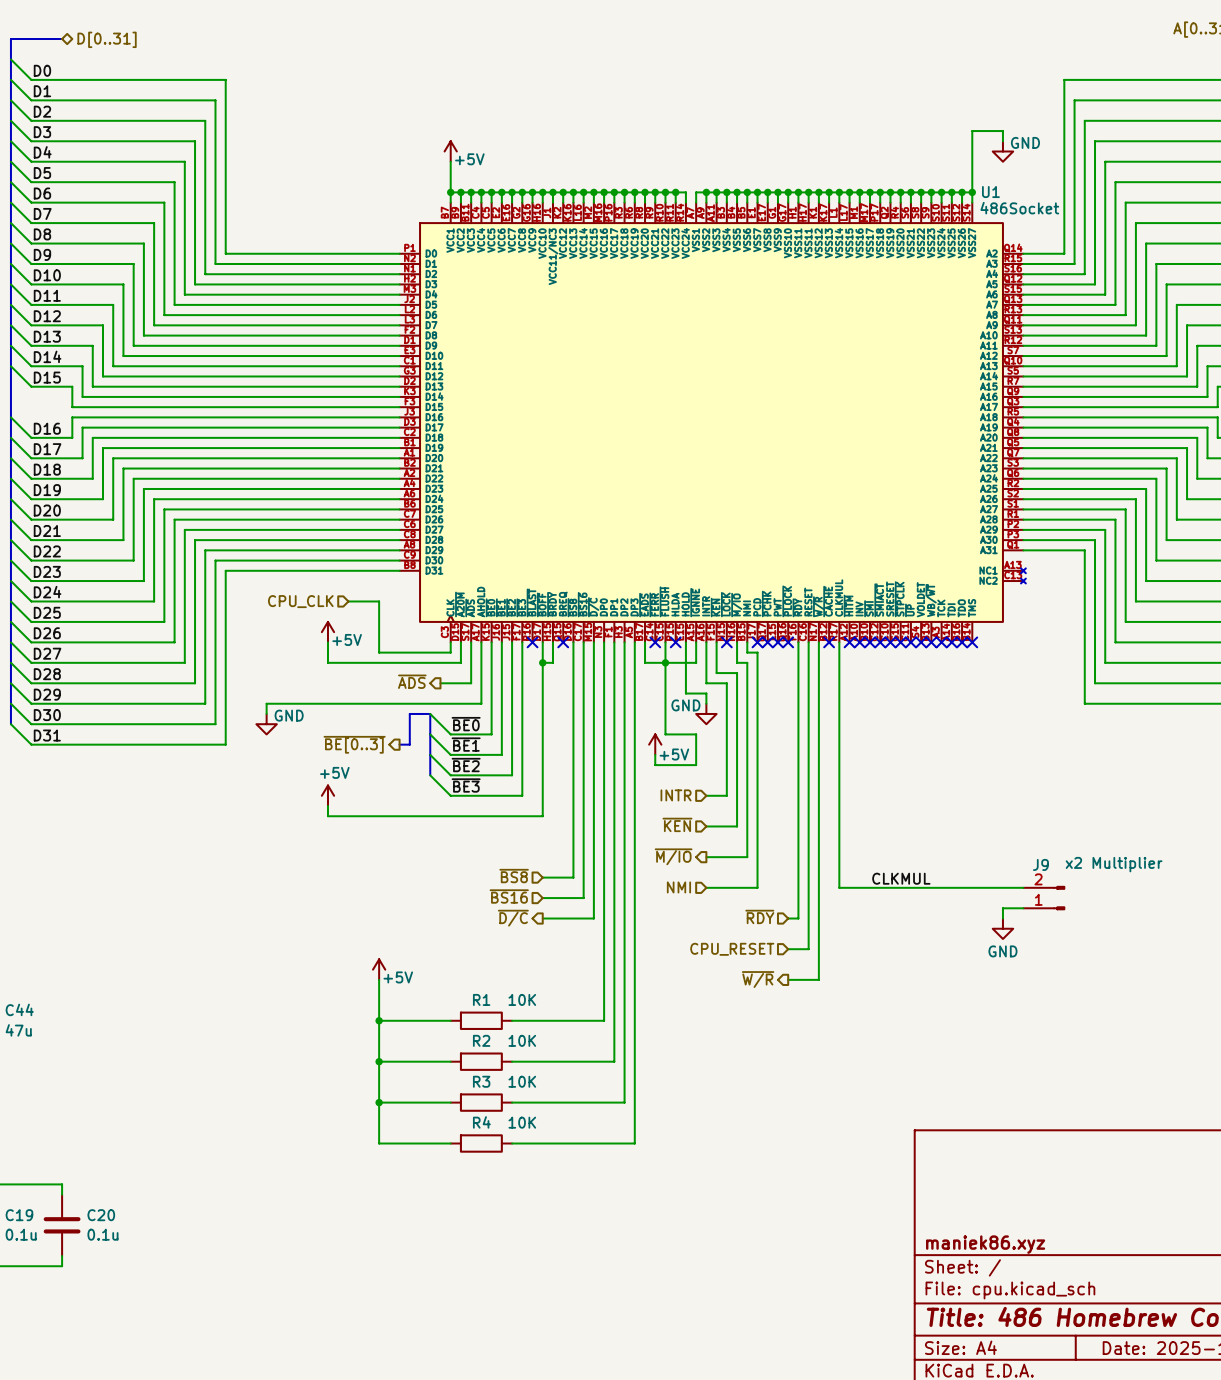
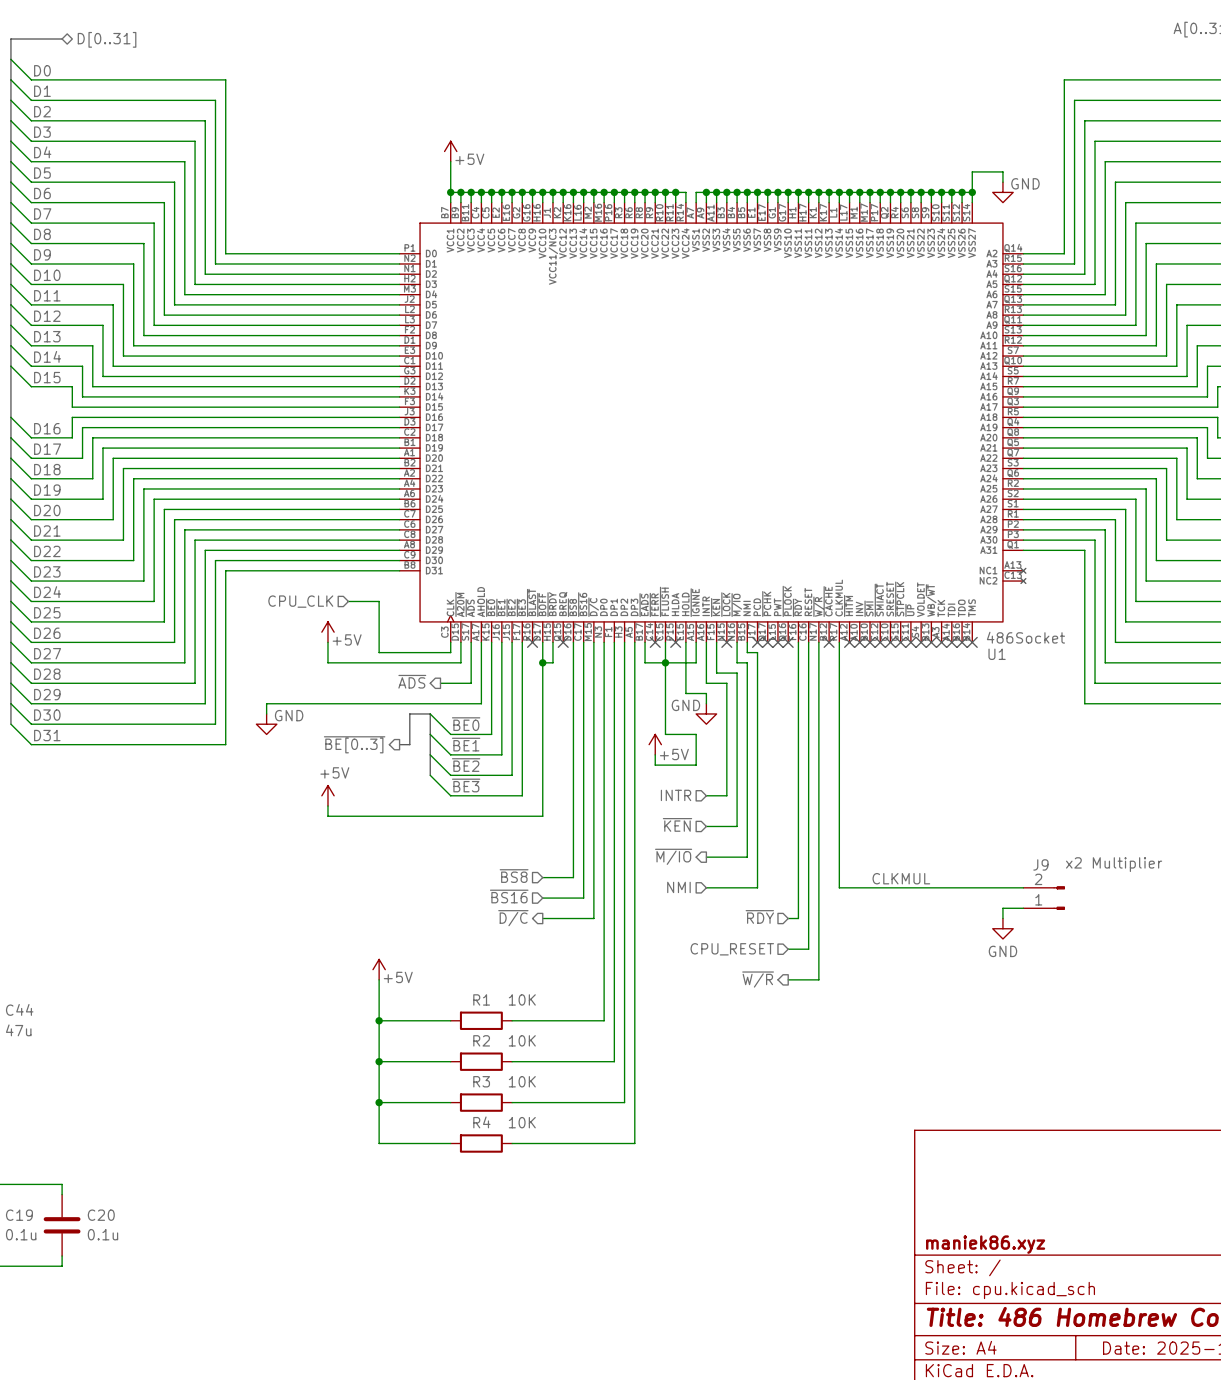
wire: (1002, 141) (1002, 131) (972, 131) (972, 171) -> (1002, 182) (1002, 171) (972, 171)
power symbol position: GND (1002, 151) -> GND (1002, 192)
U1 name position: U1 (990, 192) -> U1 (997, 654)
U1 value position: 486Socket (1019, 208) -> 486Socket (1025, 637)

